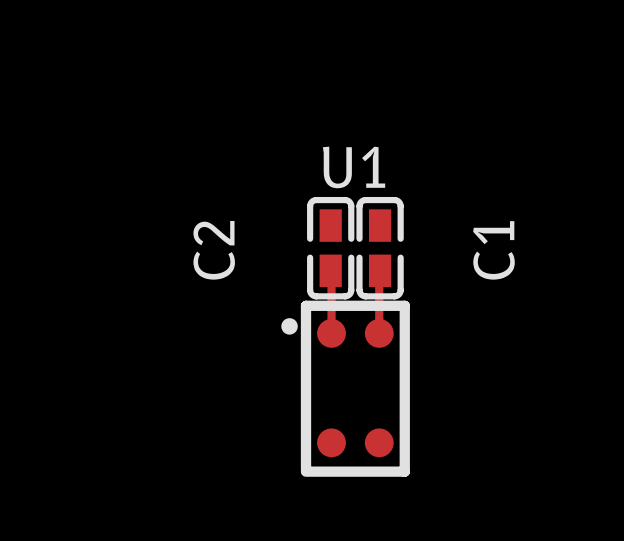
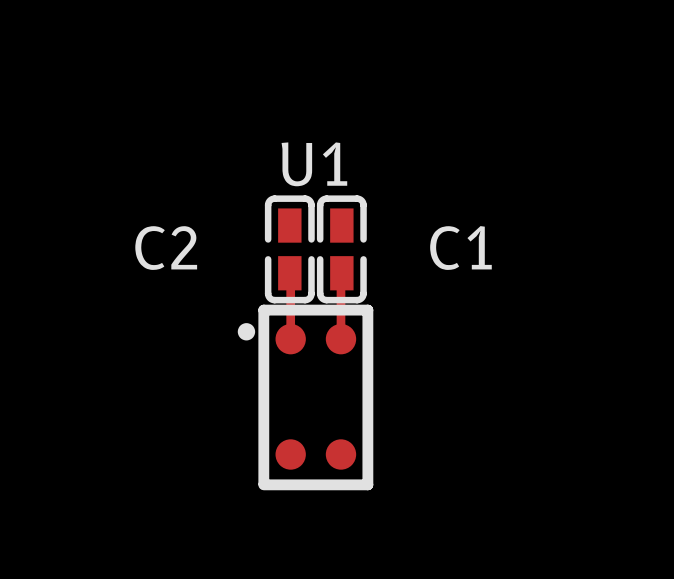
C2 name rotation: 0° (214, 250) -> 90° clockwise (166, 248)
C1 name rotation: 0° (493, 250) -> 90° clockwise (460, 248)

